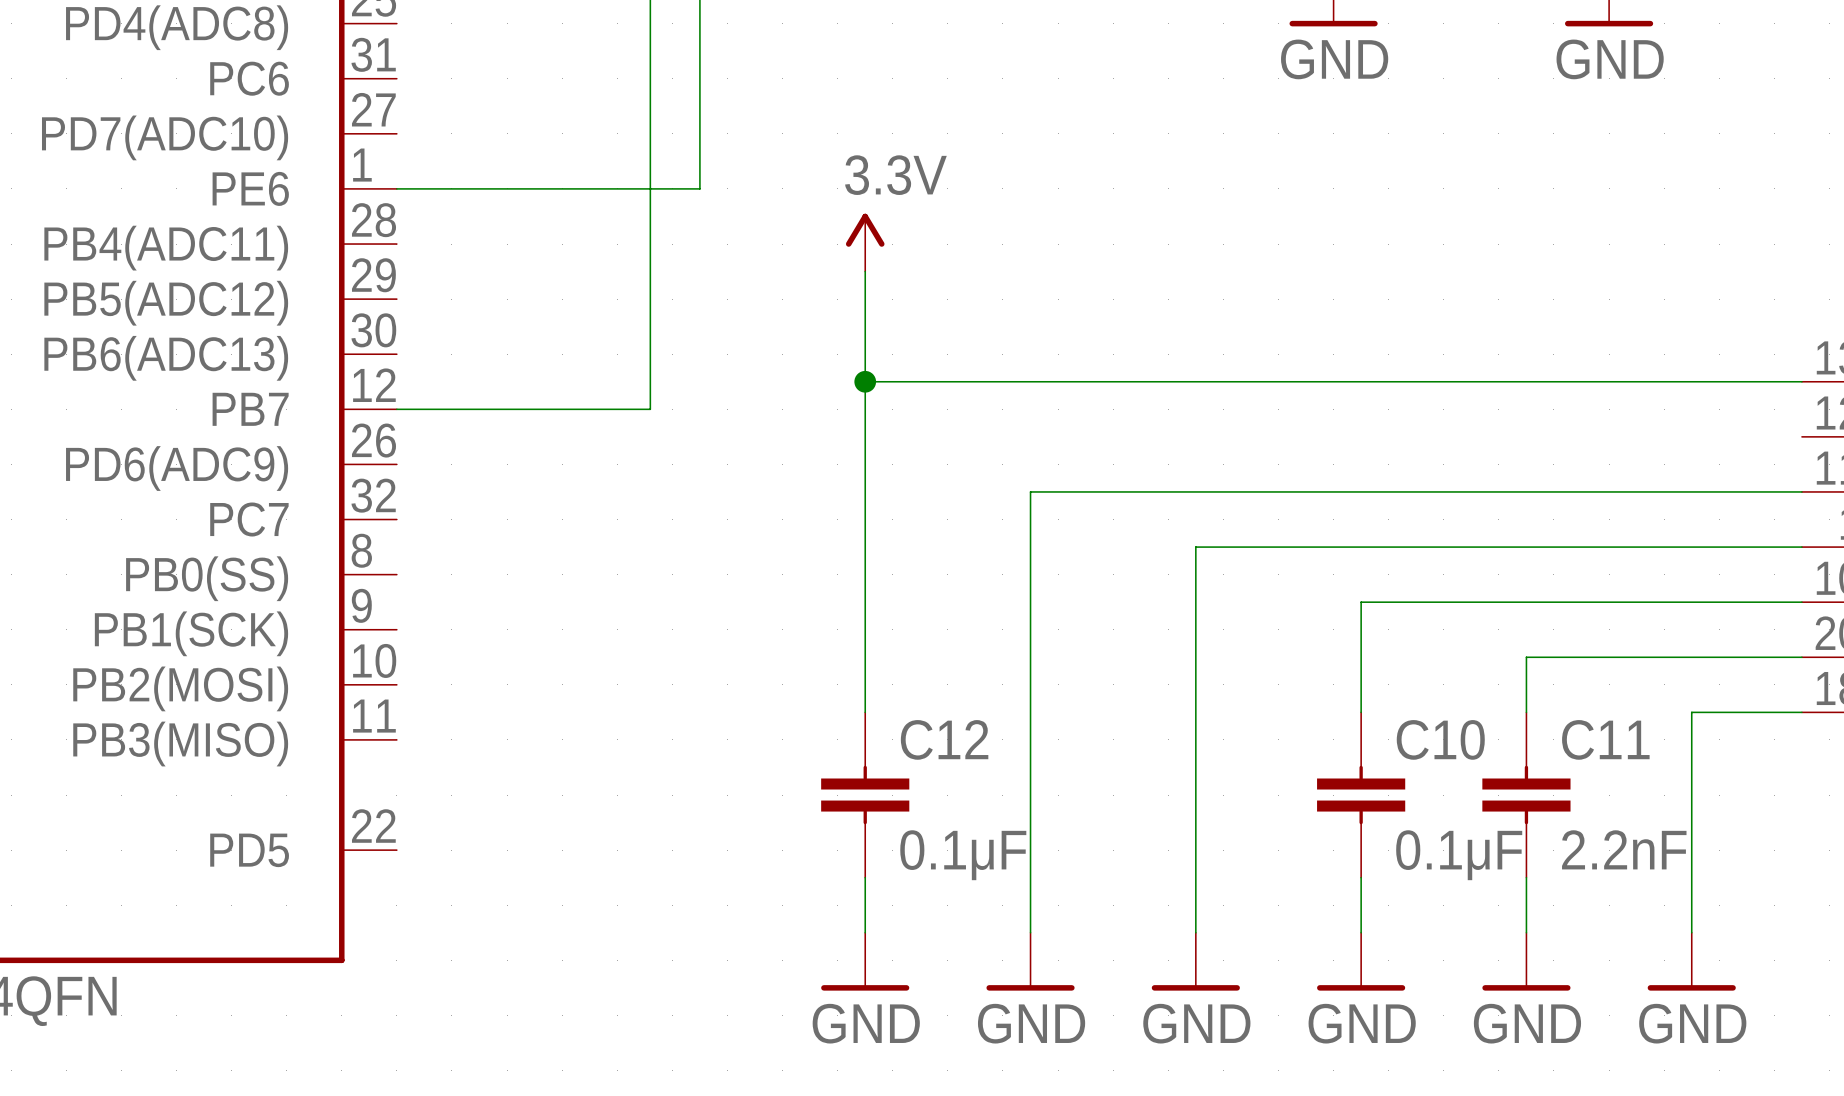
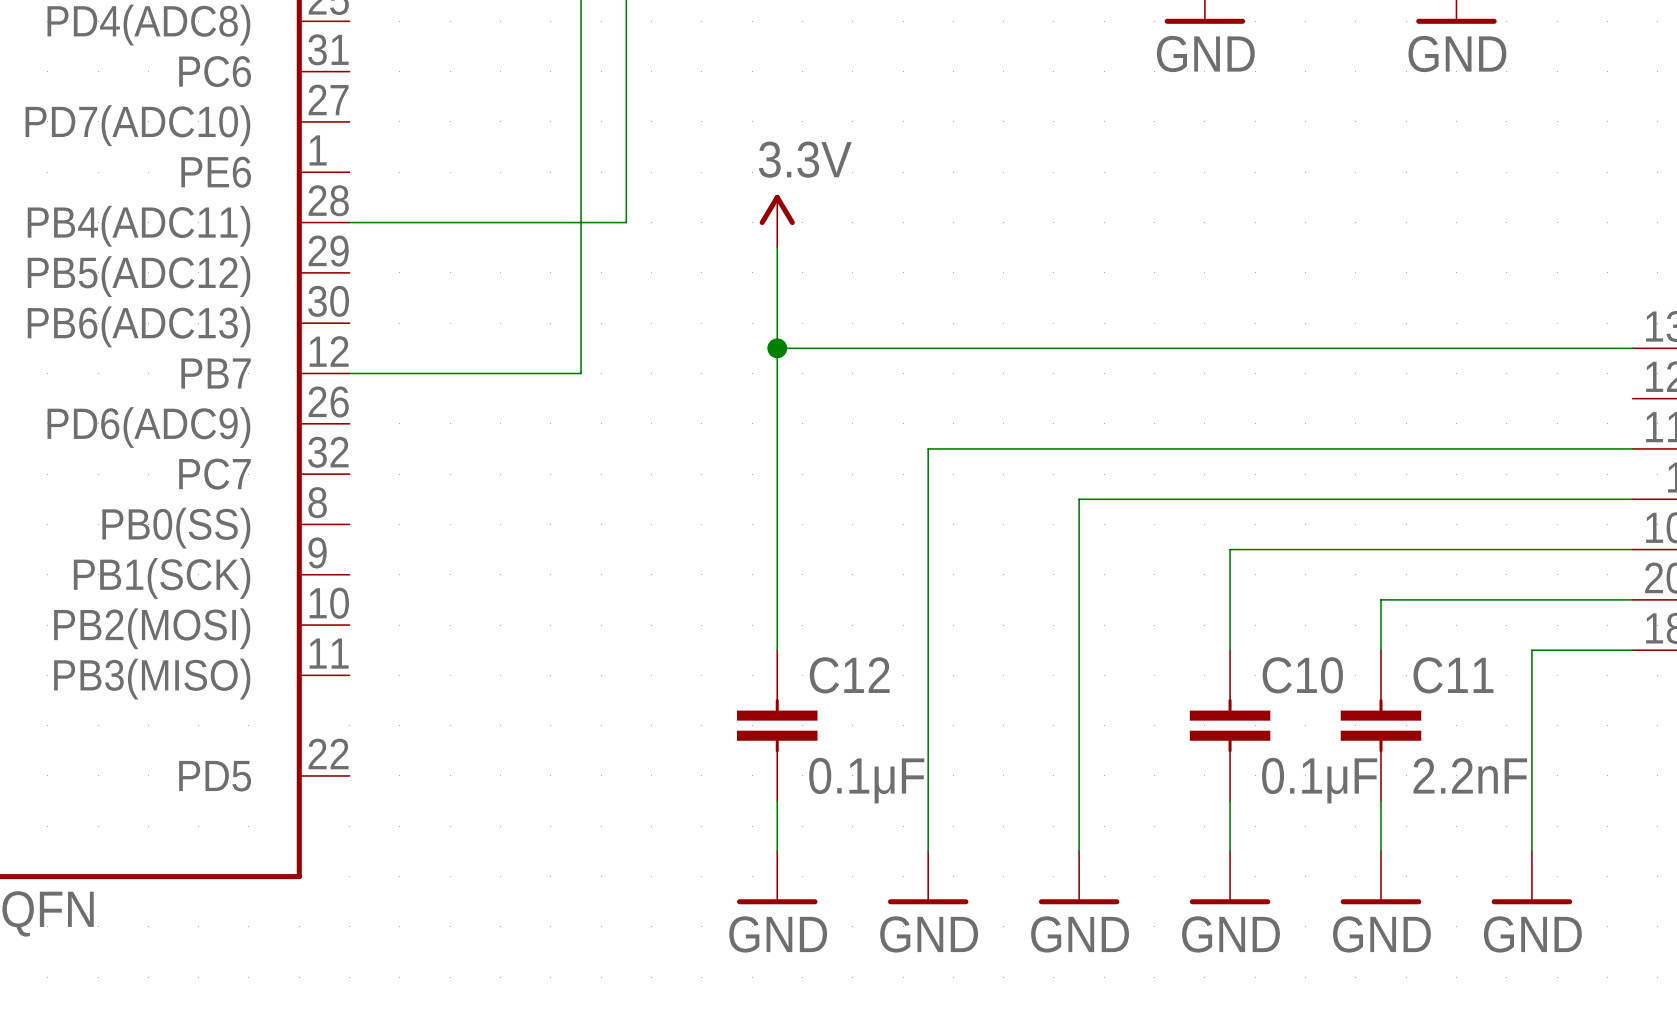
wire: (396, 188) (699, 188) -> (349, 222) (626, 222) (626, 172)

